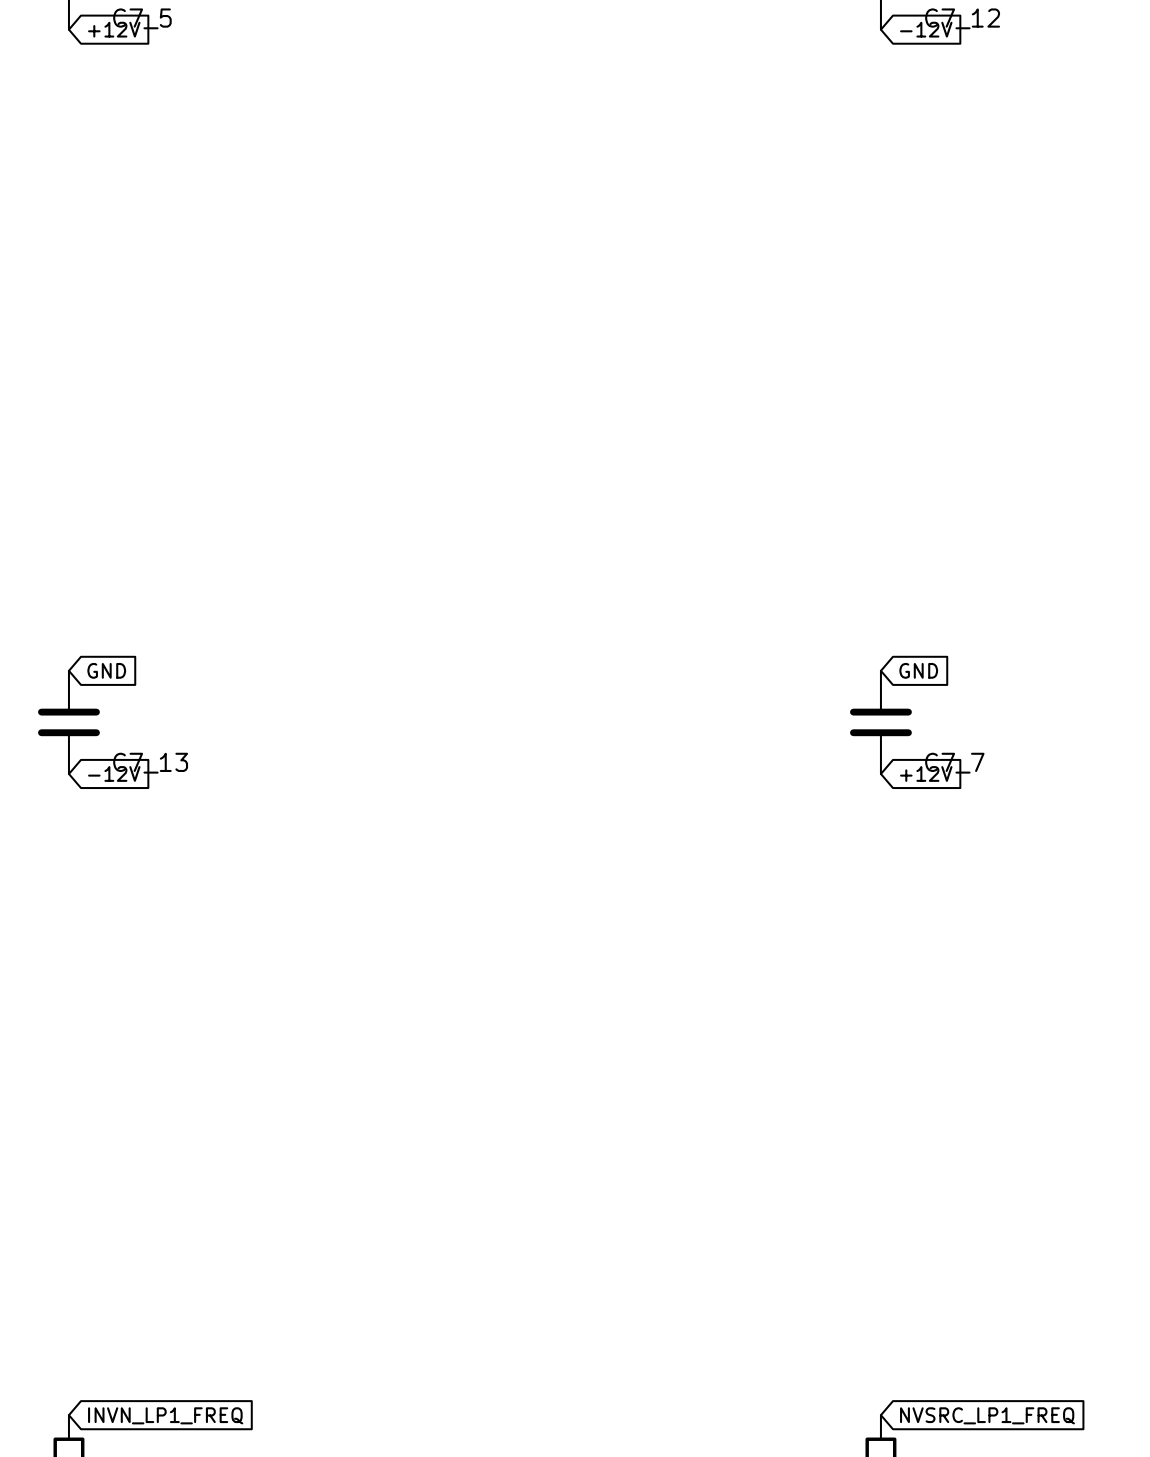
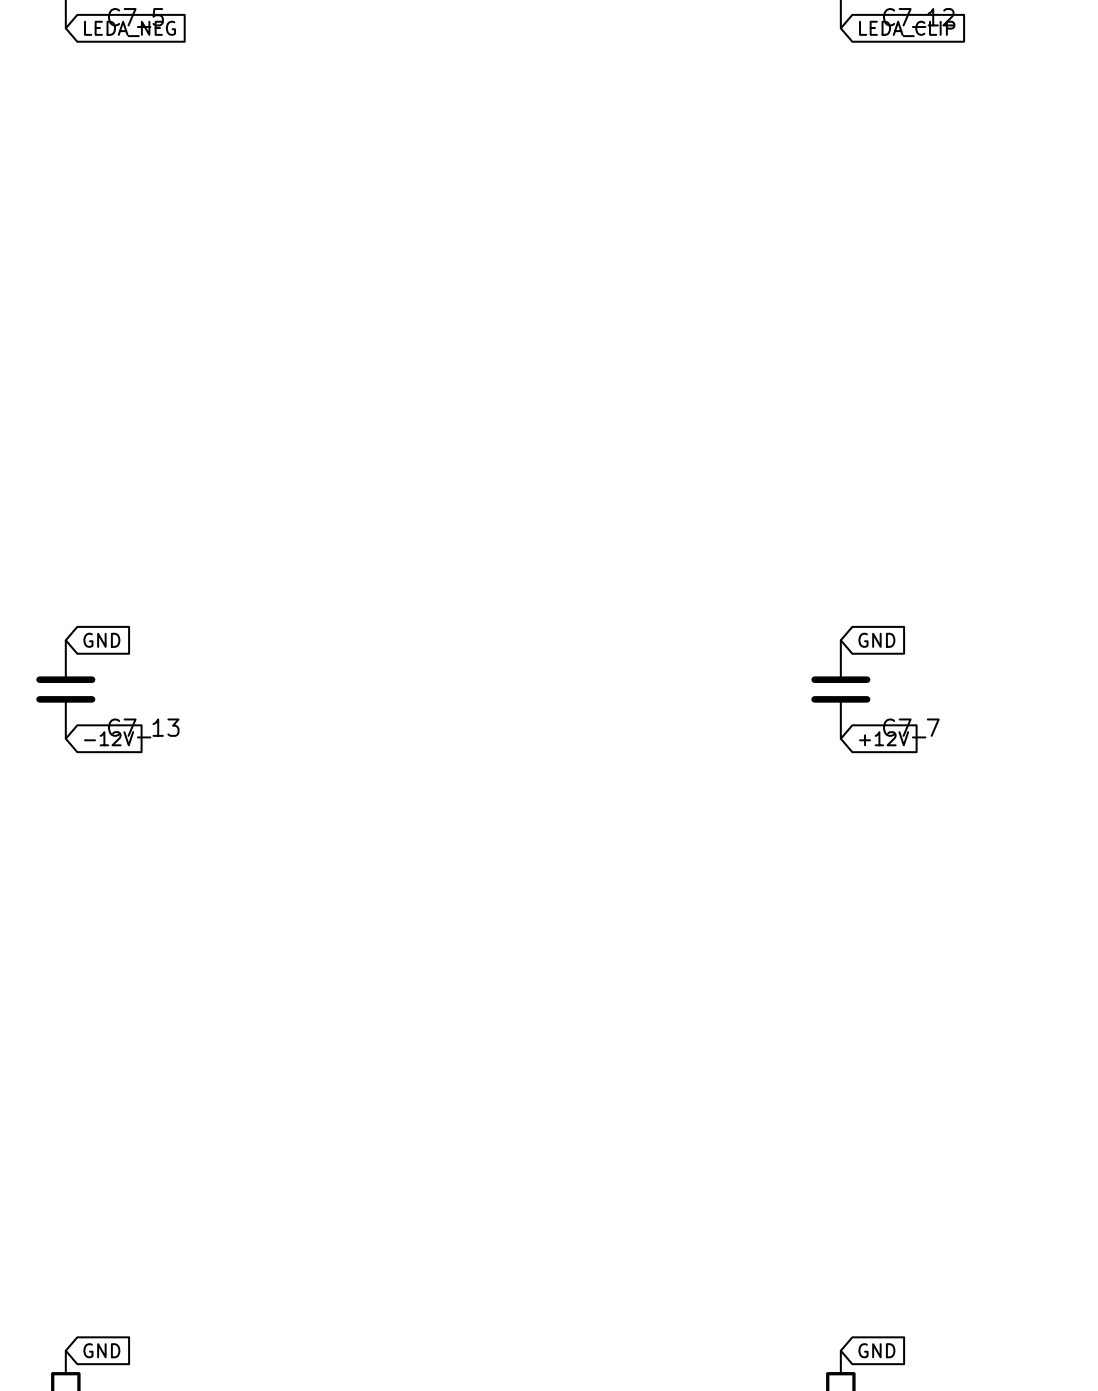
global label: +12V (114, 29) -> LEDA_NEG (130, 28)
global label: -12V (926, 29) -> LEDA_CLIP (907, 28)
global label: INVN_LP1_FREQ (165, 1415) -> GND (101, 1350)
global label: NVSRC_LP1_FREQ (987, 1415) -> GND (876, 1350)

